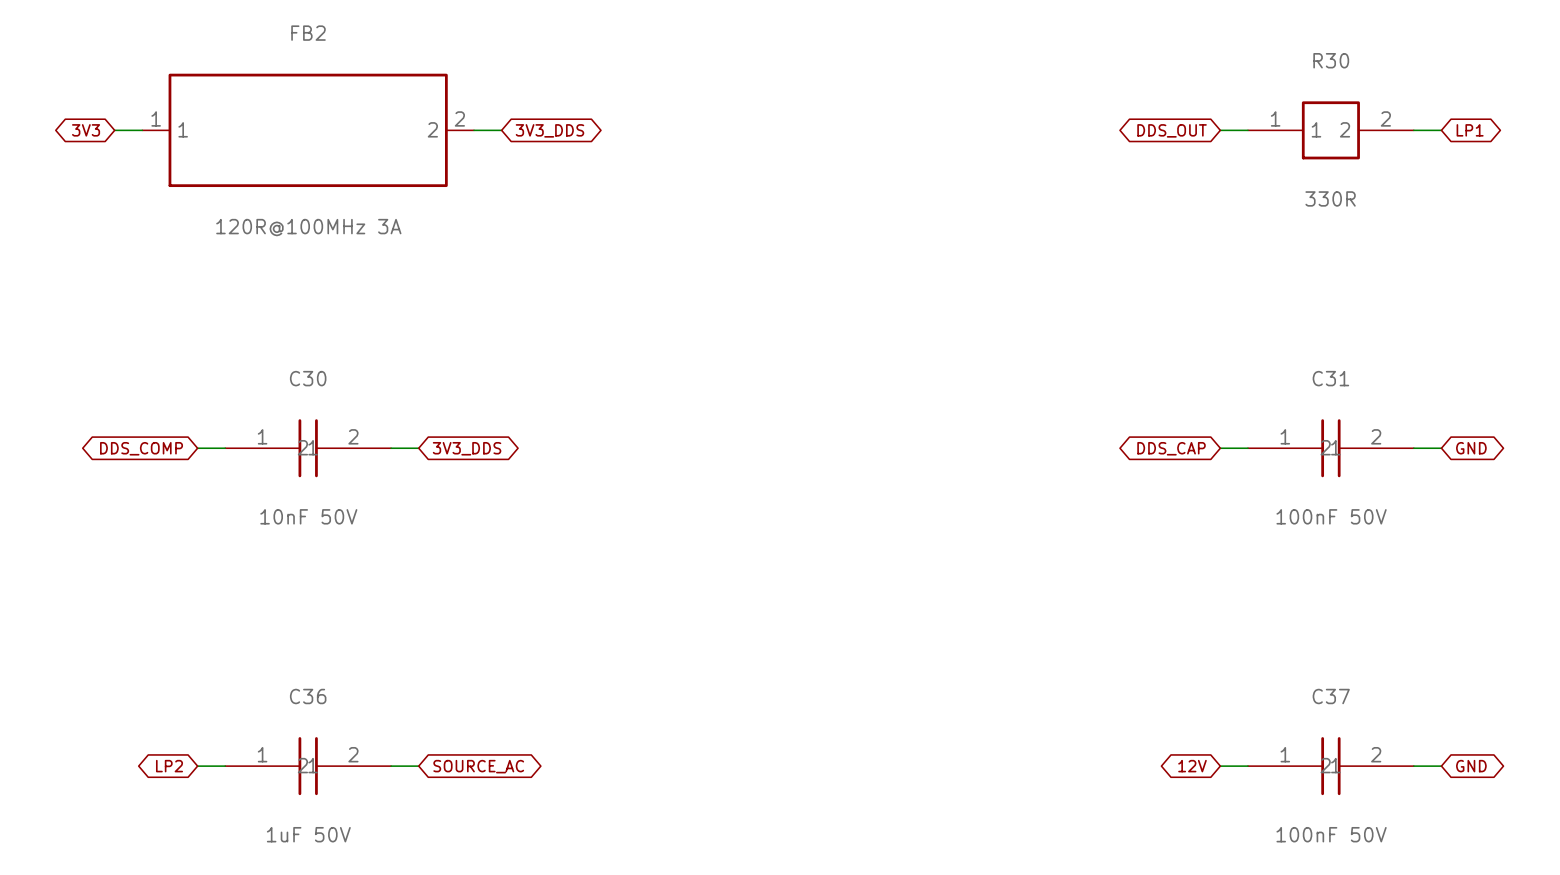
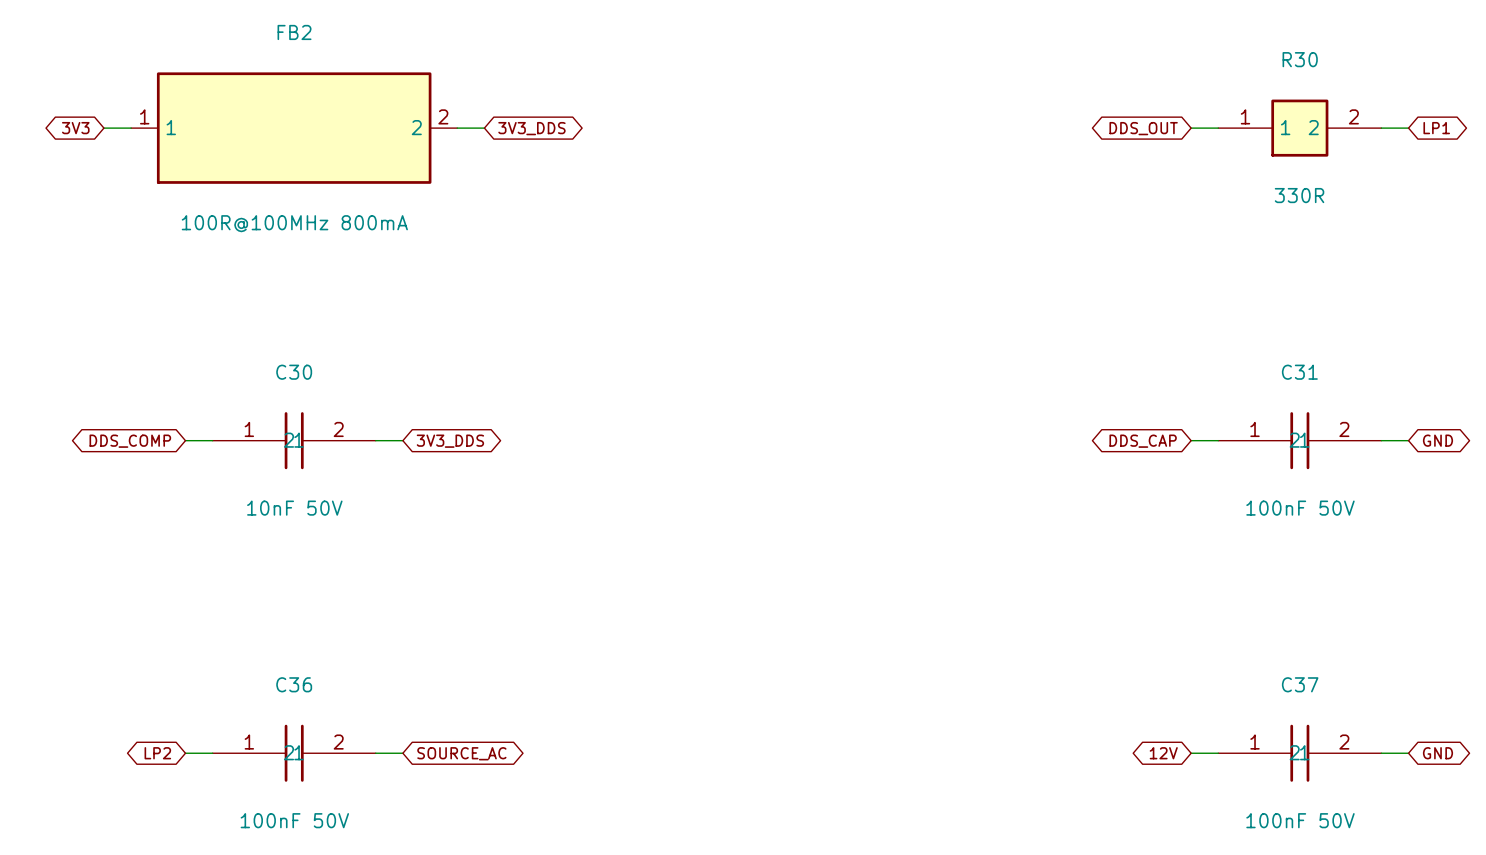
FB2 value: 120R@100MHz 3A (308, 227) -> 100R@100MHz 800mA (294, 223)
C36 value: 1uF 50V (308, 834) -> 100nF 50V (294, 820)

